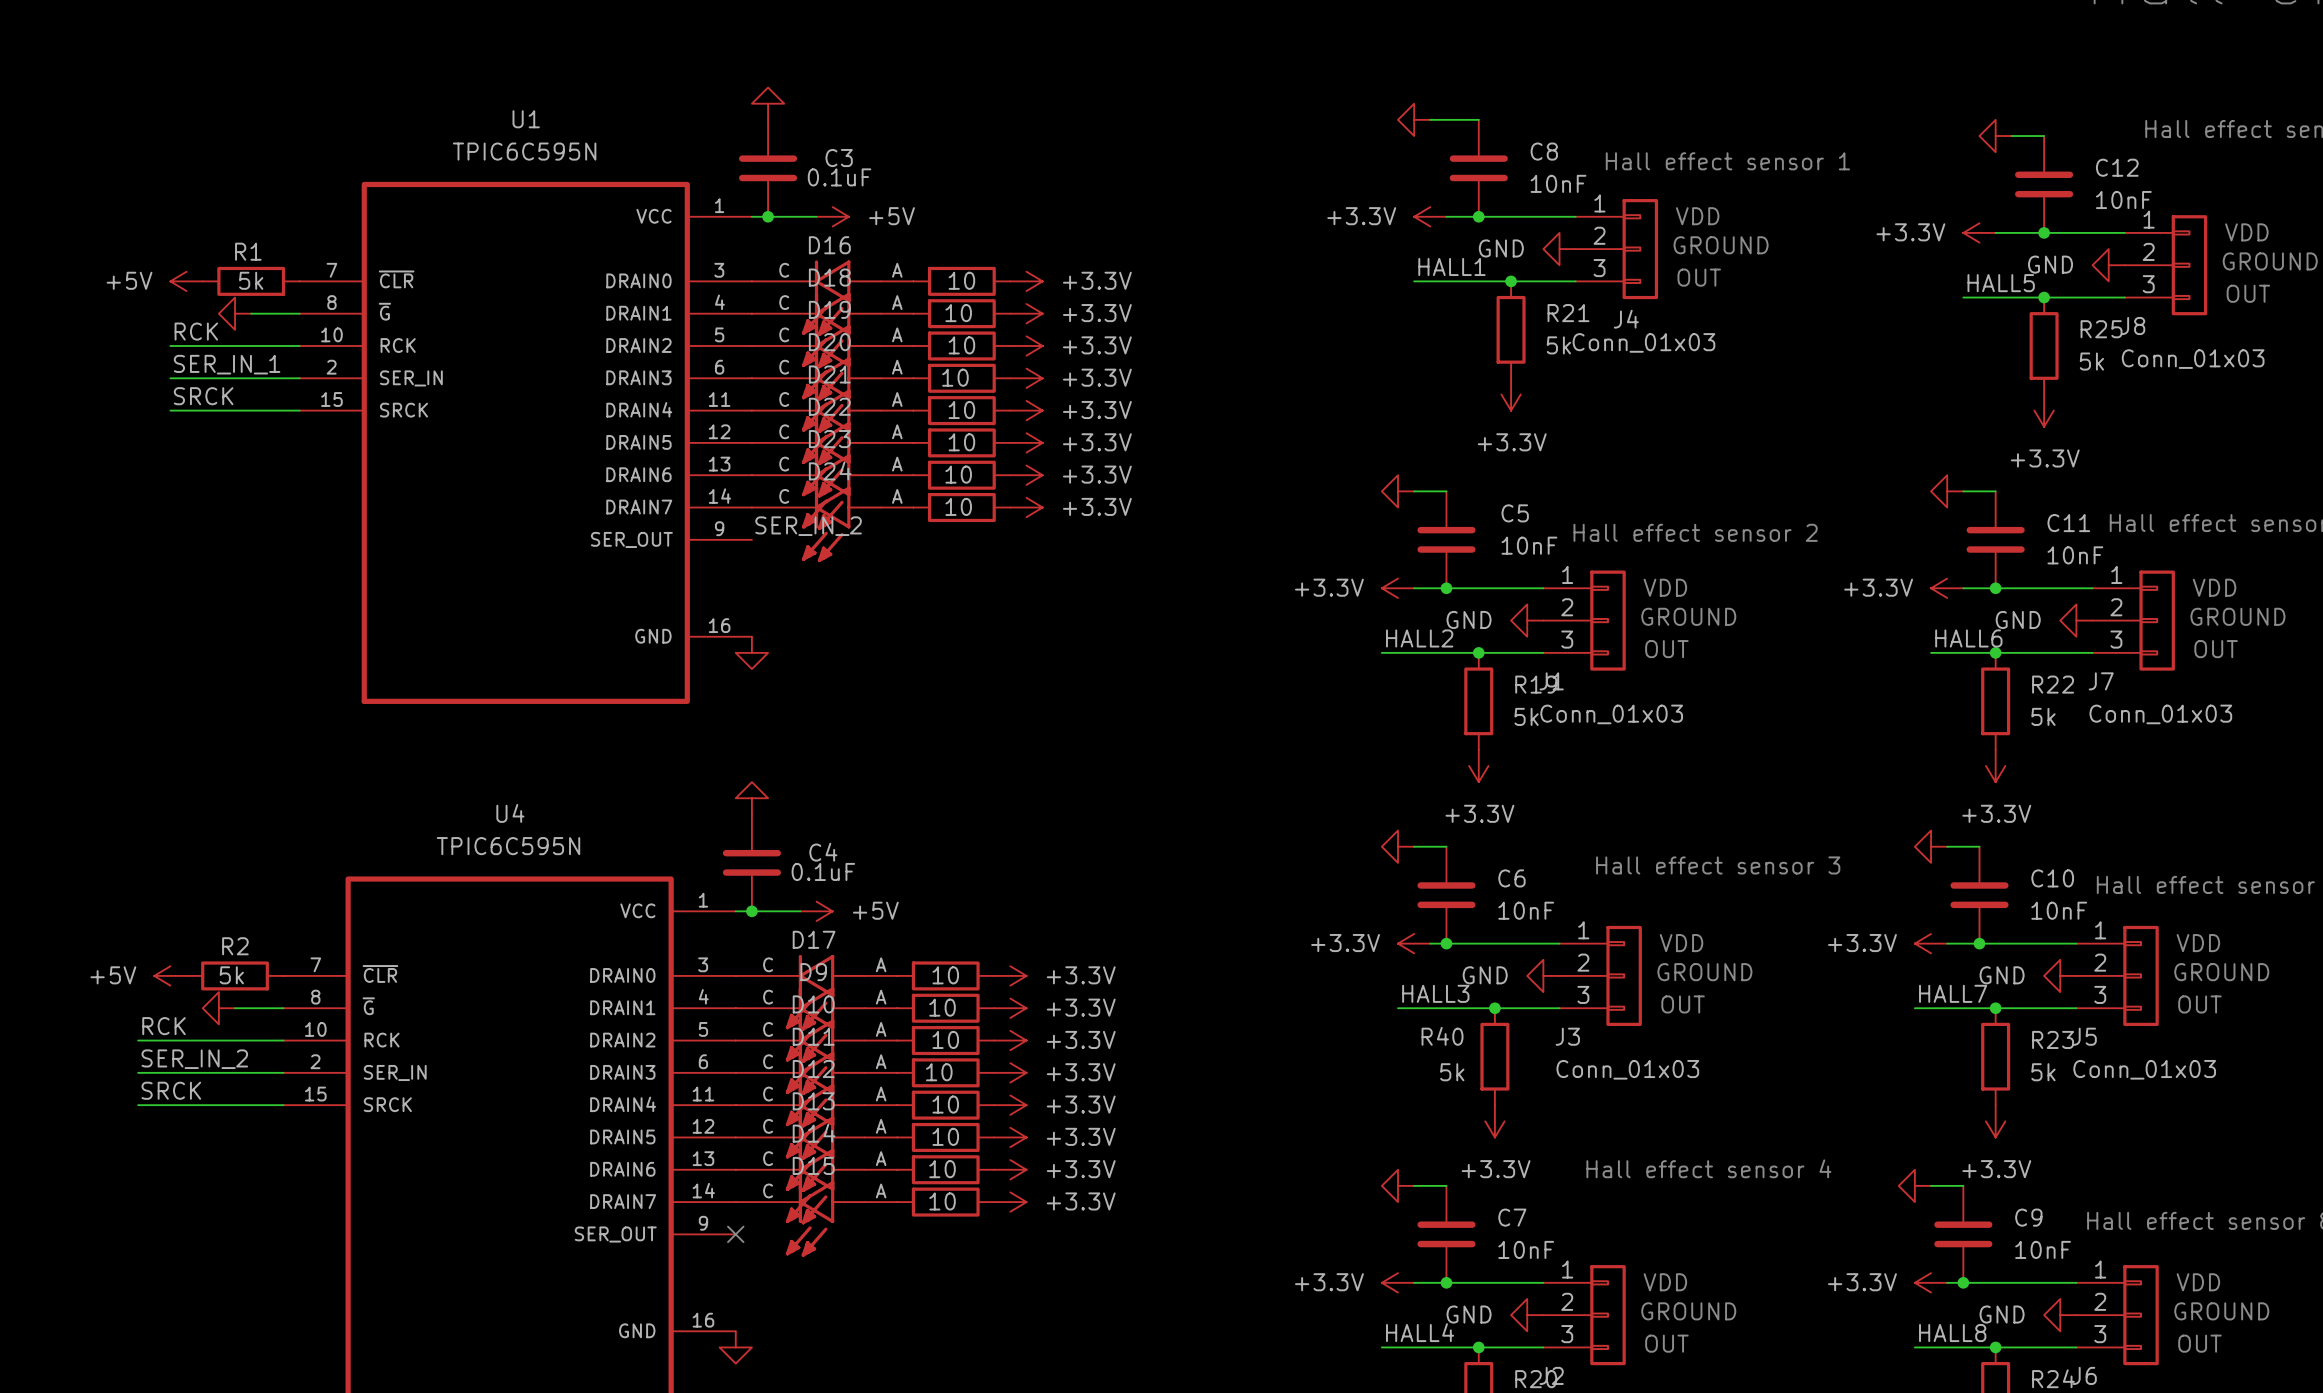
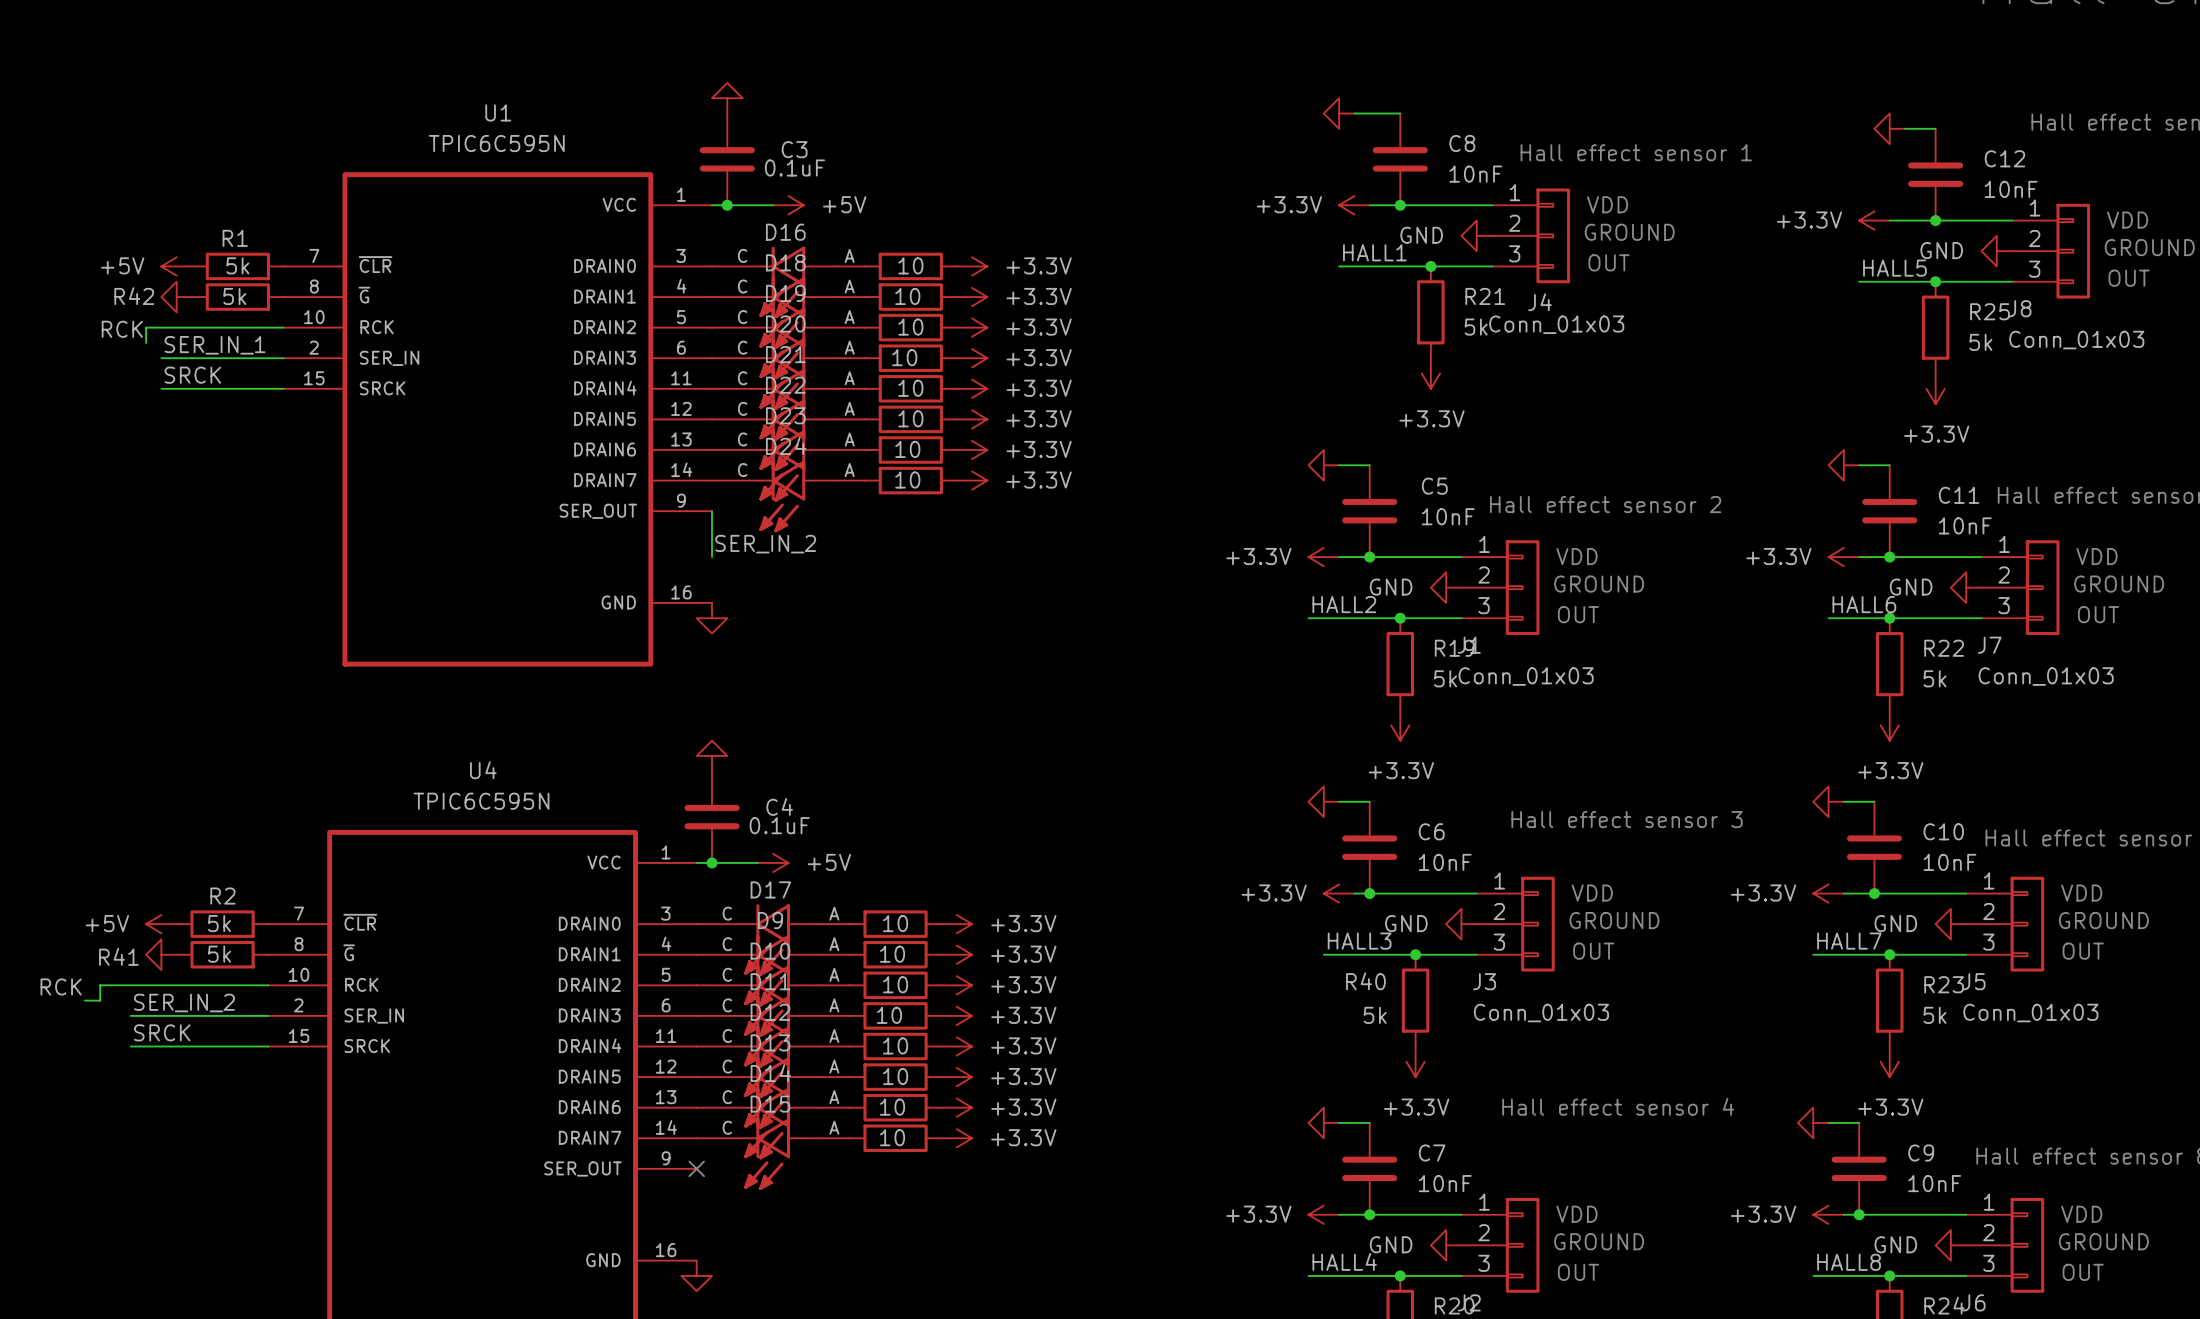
power symbol position: (235, 313) -> (176, 297)
wire: (251, 313) (299, 313) -> none
R42: none -> 5k (237, 297)
label position: RCK (196, 331) -> RCK (122, 329)
wire: none -> (161, 327) (146, 327) (146, 342)
label position: SER_IN_2 (808, 526) -> SER_IN_2 (765, 544)
wire: none -> (712, 511) (712, 557)
power symbol position: (218, 1008) -> (161, 954)
wire: (235, 1008) (283, 1008) -> none
R41: none -> 5k (222, 954)
label position: RCK (164, 1026) -> RCK (61, 986)
wire: none -> (130, 985) (100, 985) (100, 1000) (84, 1000)

